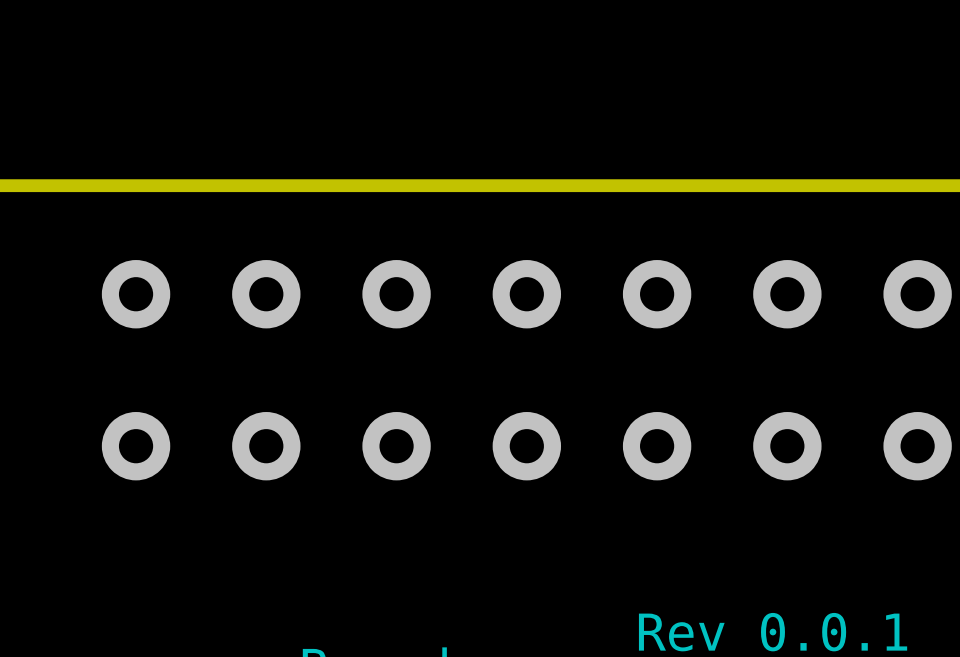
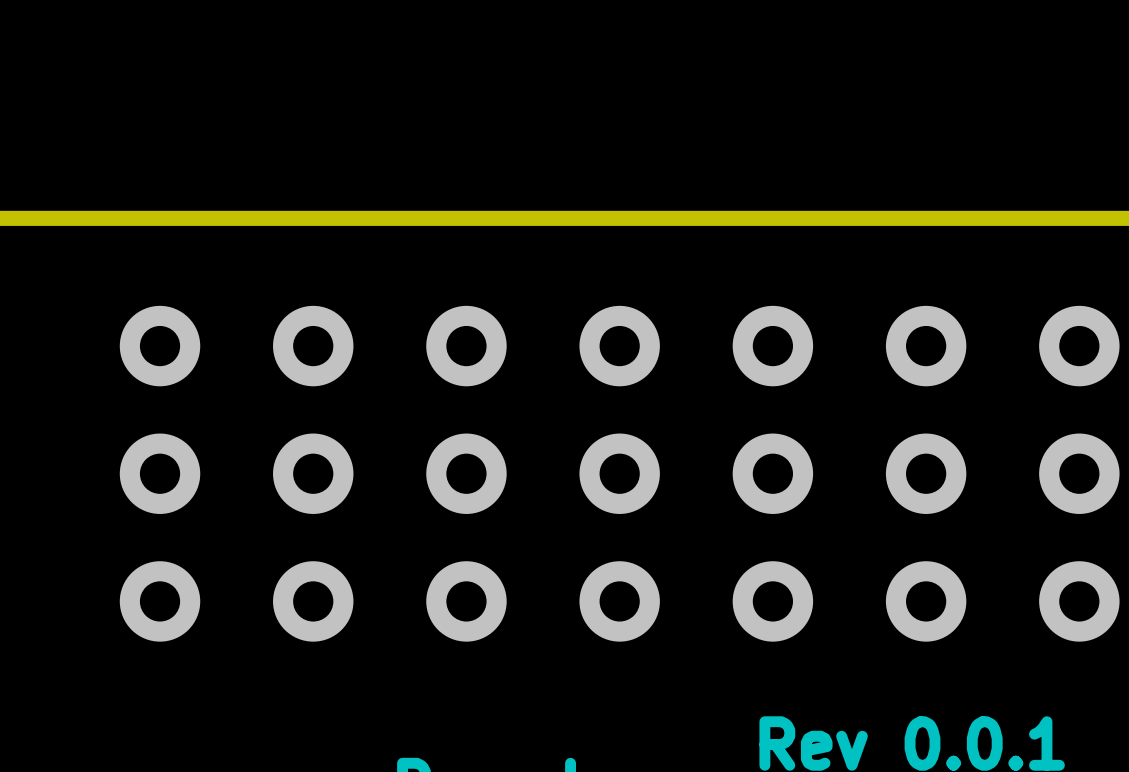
via: none -> (160, 473)
via: none -> (313, 473)
via: none -> (466, 473)
via: none -> (619, 473)
via: none -> (772, 473)
via: none -> (926, 473)
via: none -> (1079, 473)
via: (136, 446) -> none
via: (266, 446) -> none
via: (396, 446) -> none
via: (526, 446) -> none
via: (657, 446) -> none
via: (787, 446) -> none
via: (917, 446) -> none
via: none -> (160, 601)
via: none -> (313, 601)
via: none -> (466, 601)
via: none -> (619, 601)
via: none -> (772, 601)
via: none -> (926, 601)
via: none -> (1079, 601)

